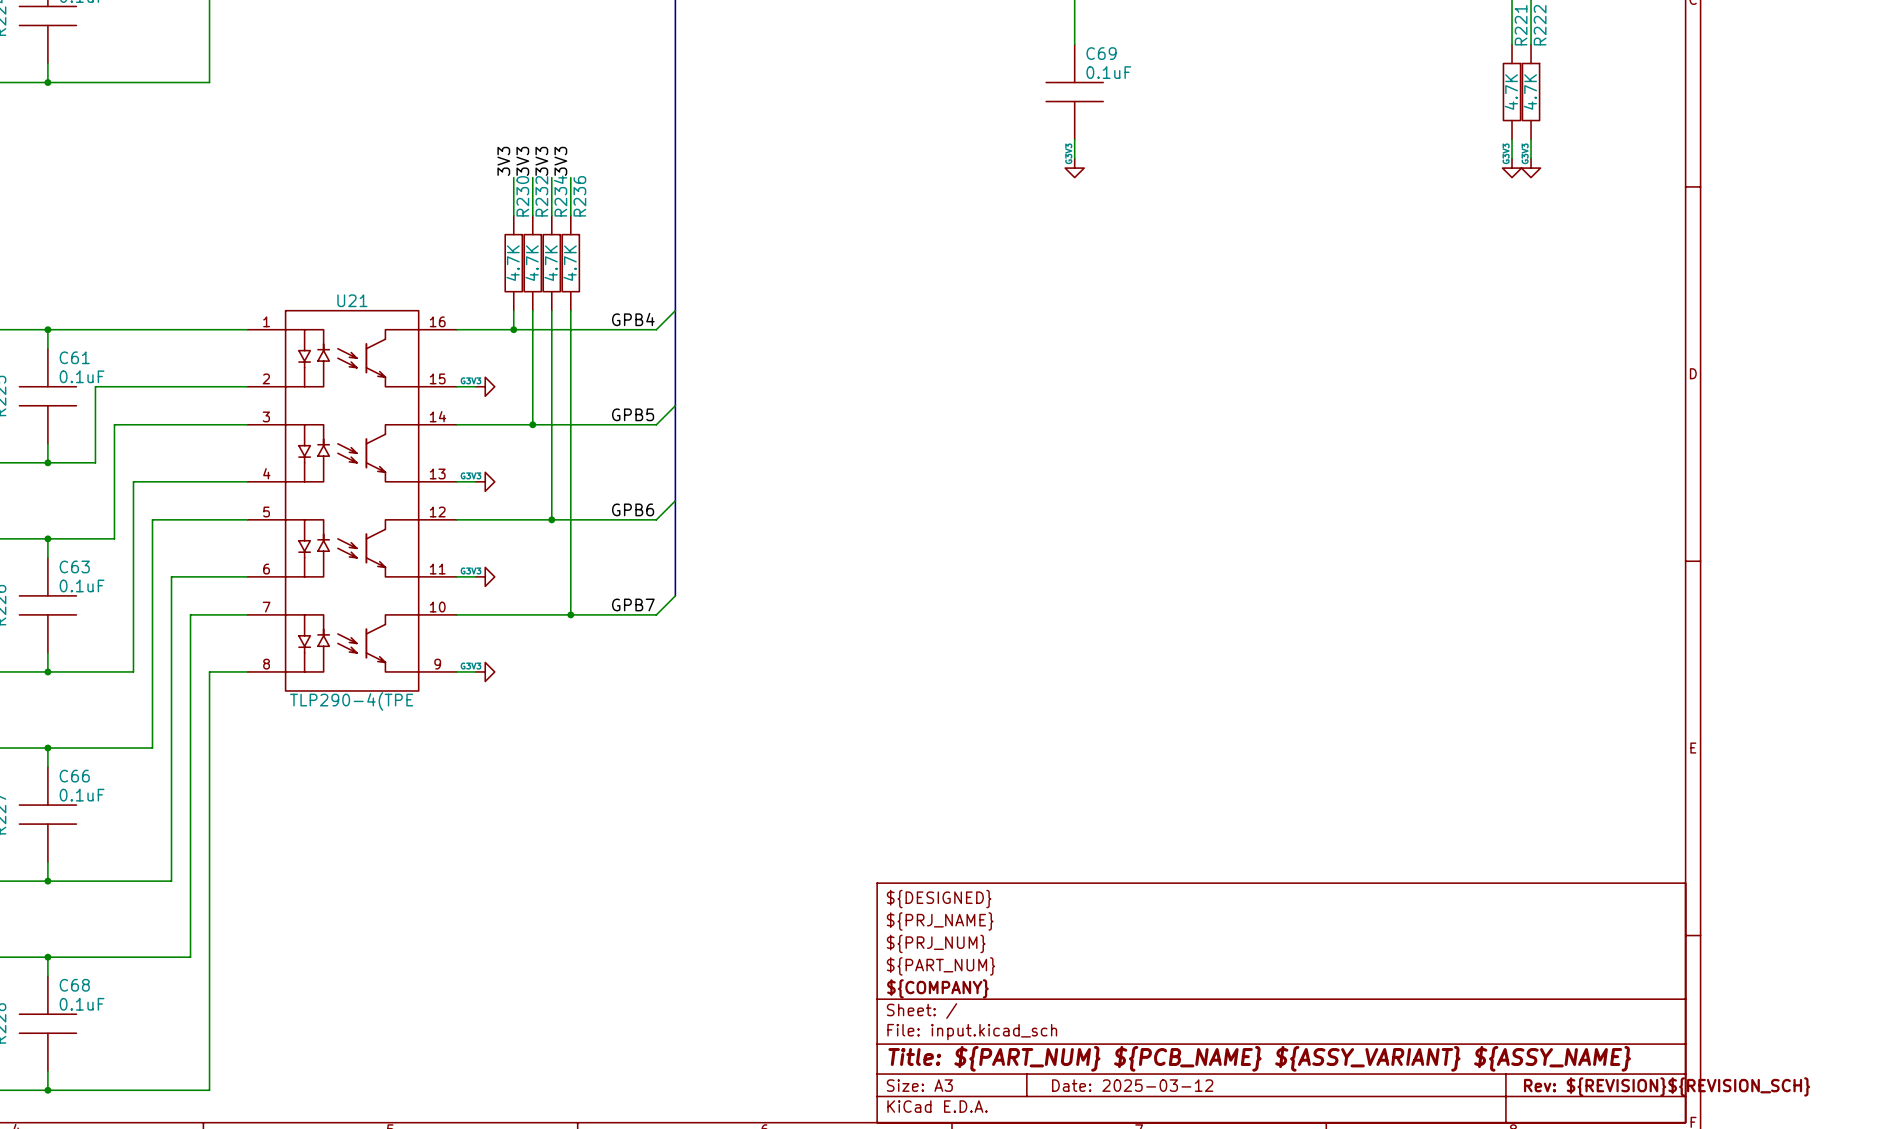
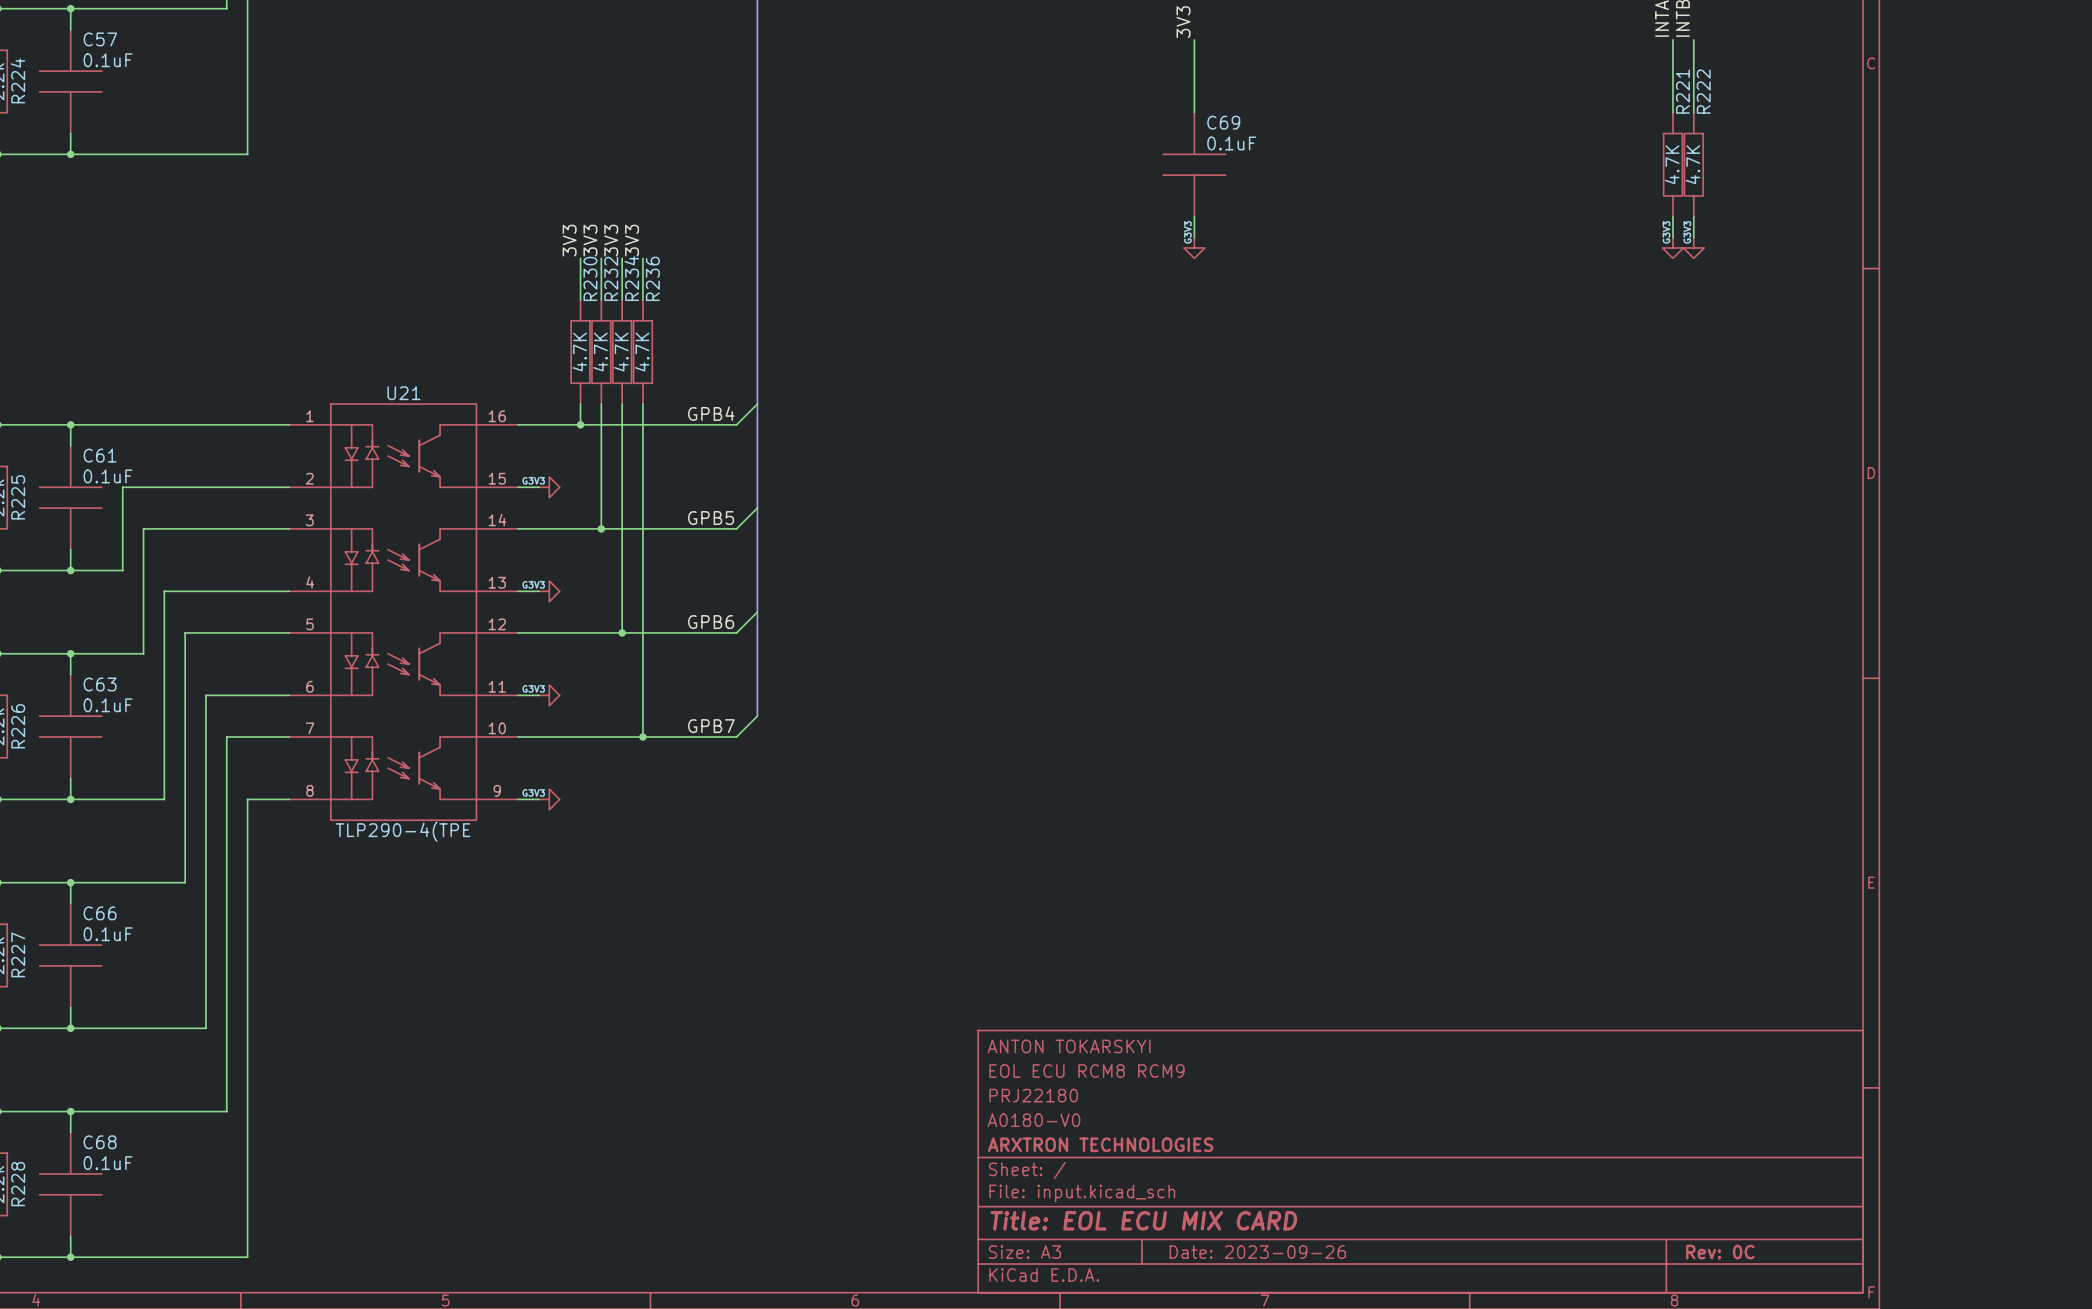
title block: ${DESIGNED} (939, 899) -> ANTON TOKARSKYI (1069, 1046)
title block: ${PRJ_NAME} (940, 921) -> EOL ECU RCM8 RCM9 (1086, 1071)
title block: ${PRJ_NUM} (936, 943) -> PRJ22180 (1033, 1095)
title block: ${PART_NUM} (940, 966) -> A0180-V0 (1034, 1120)
title block: ${COMPANY} (937, 988) -> ARXTRON TECHNOLOGIES (1100, 1144)
title block: Title: ${PART_NUM} ${PCB_NAME} ${ASSY_VARIANT} ${ASSY_NAME} (1259, 1058) -> Title: EOL ECU MIX CARD (1143, 1220)
title block: Date: 2025-03-12 (1132, 1085) -> Date: 2023-09-26 (1257, 1252)
title block: Rev: ${REVISION}${REVISION_SCH} (1667, 1086) -> Rev: 0C (1720, 1252)

